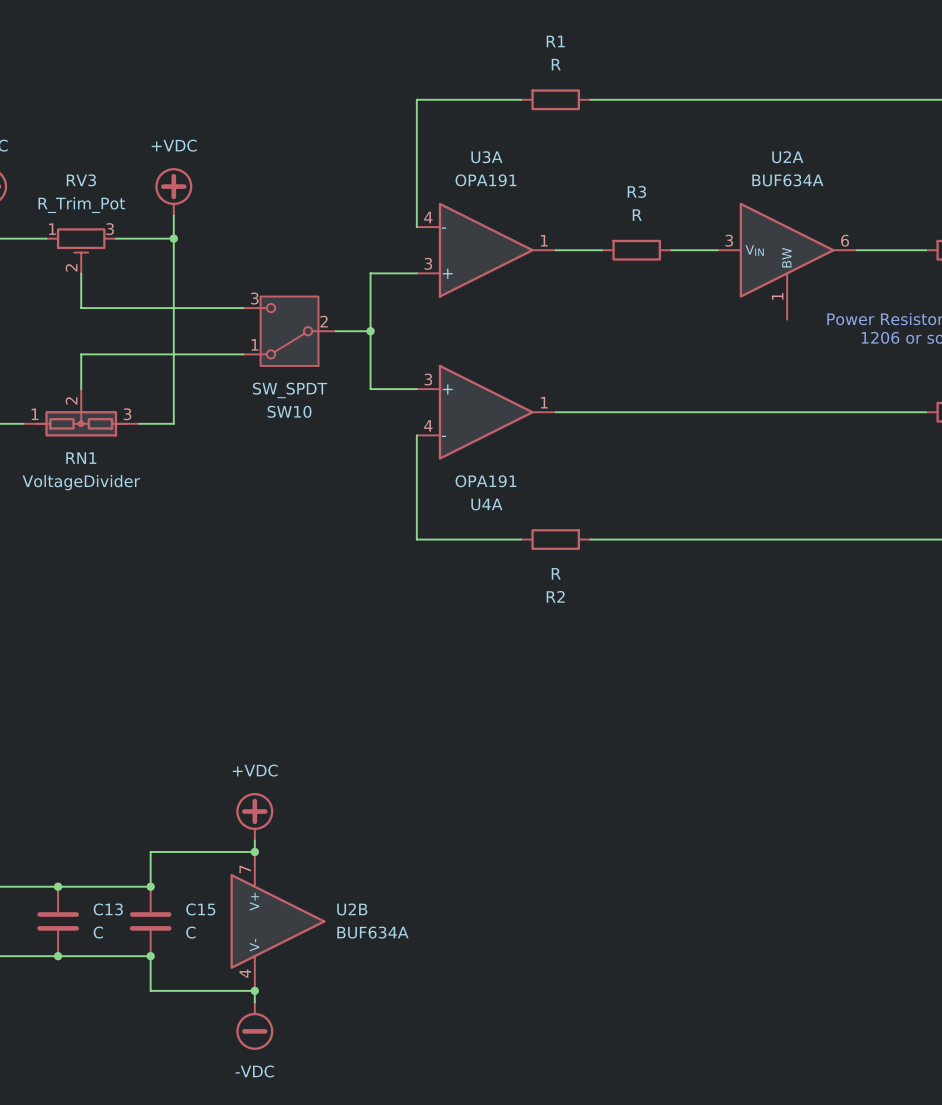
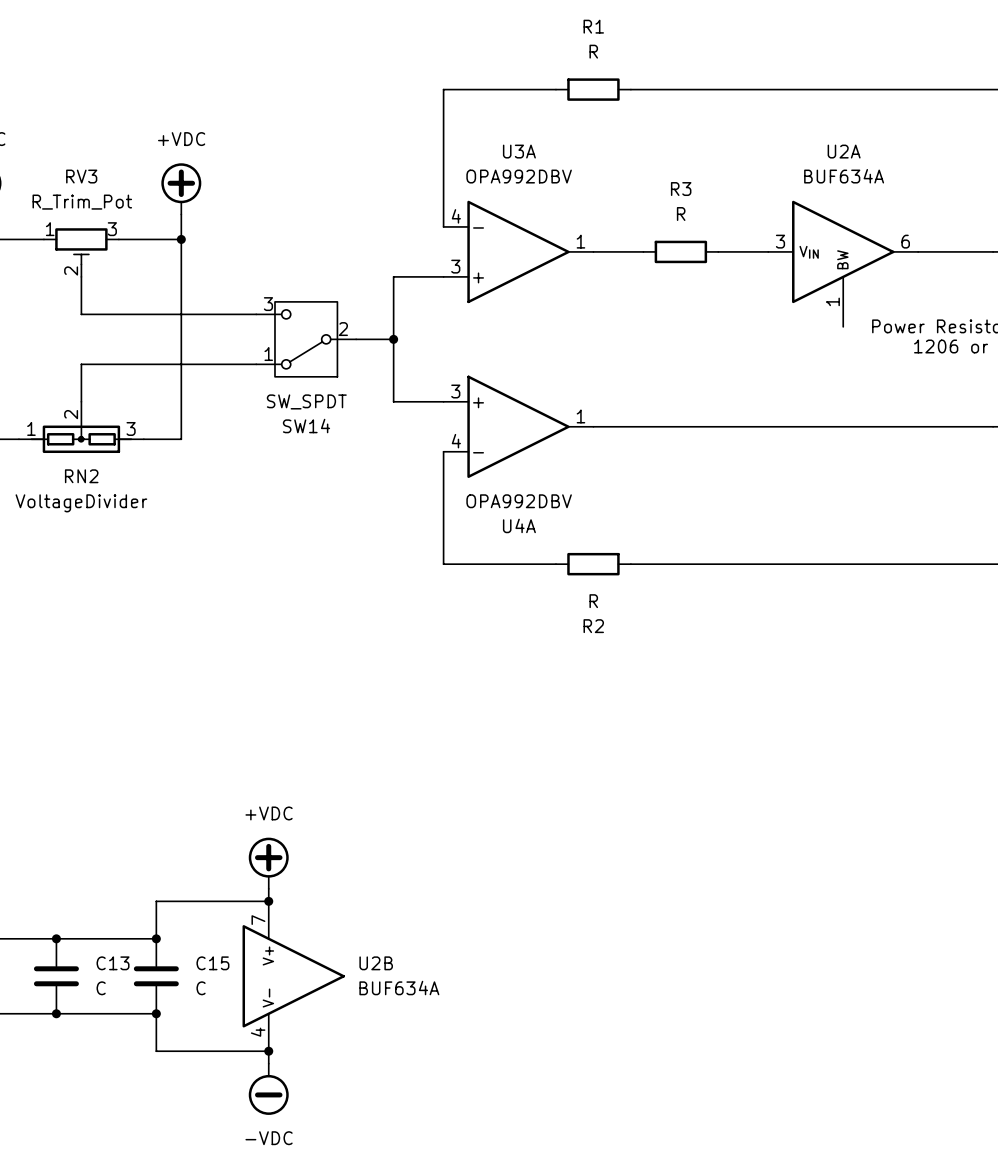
U3A value: OPA191 (485, 180) -> OPA992DBV (519, 176)
SW10 name: SW10 (289, 411) -> SW14 (306, 426)
RN1 name: RN1 (81, 458) -> RN2 (81, 476)
U4A value: OPA191 (485, 481) -> OPA992DBV (519, 501)

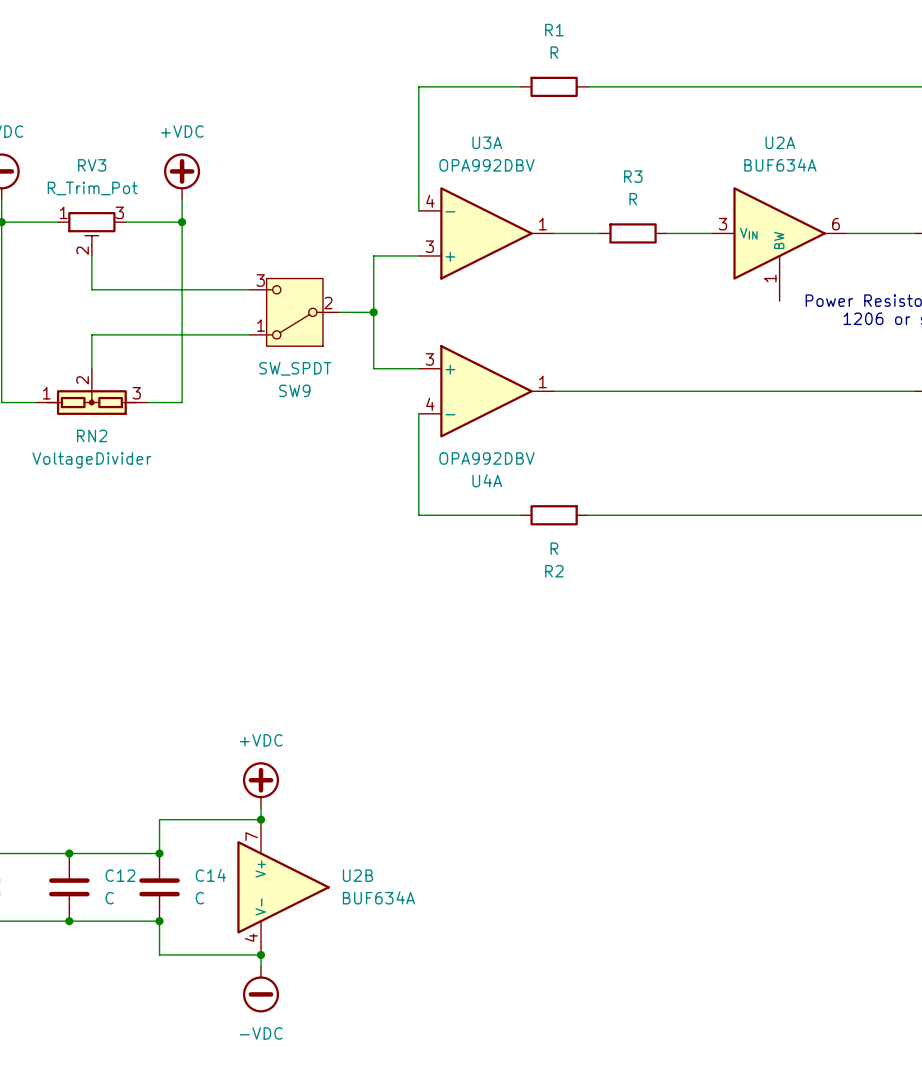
SW14 name: SW14 (306, 426) -> SW9 (294, 390)
C13 name: C13 (113, 963) -> C12 (120, 875)
C15 name: C15 (212, 963) -> C14 (210, 875)

